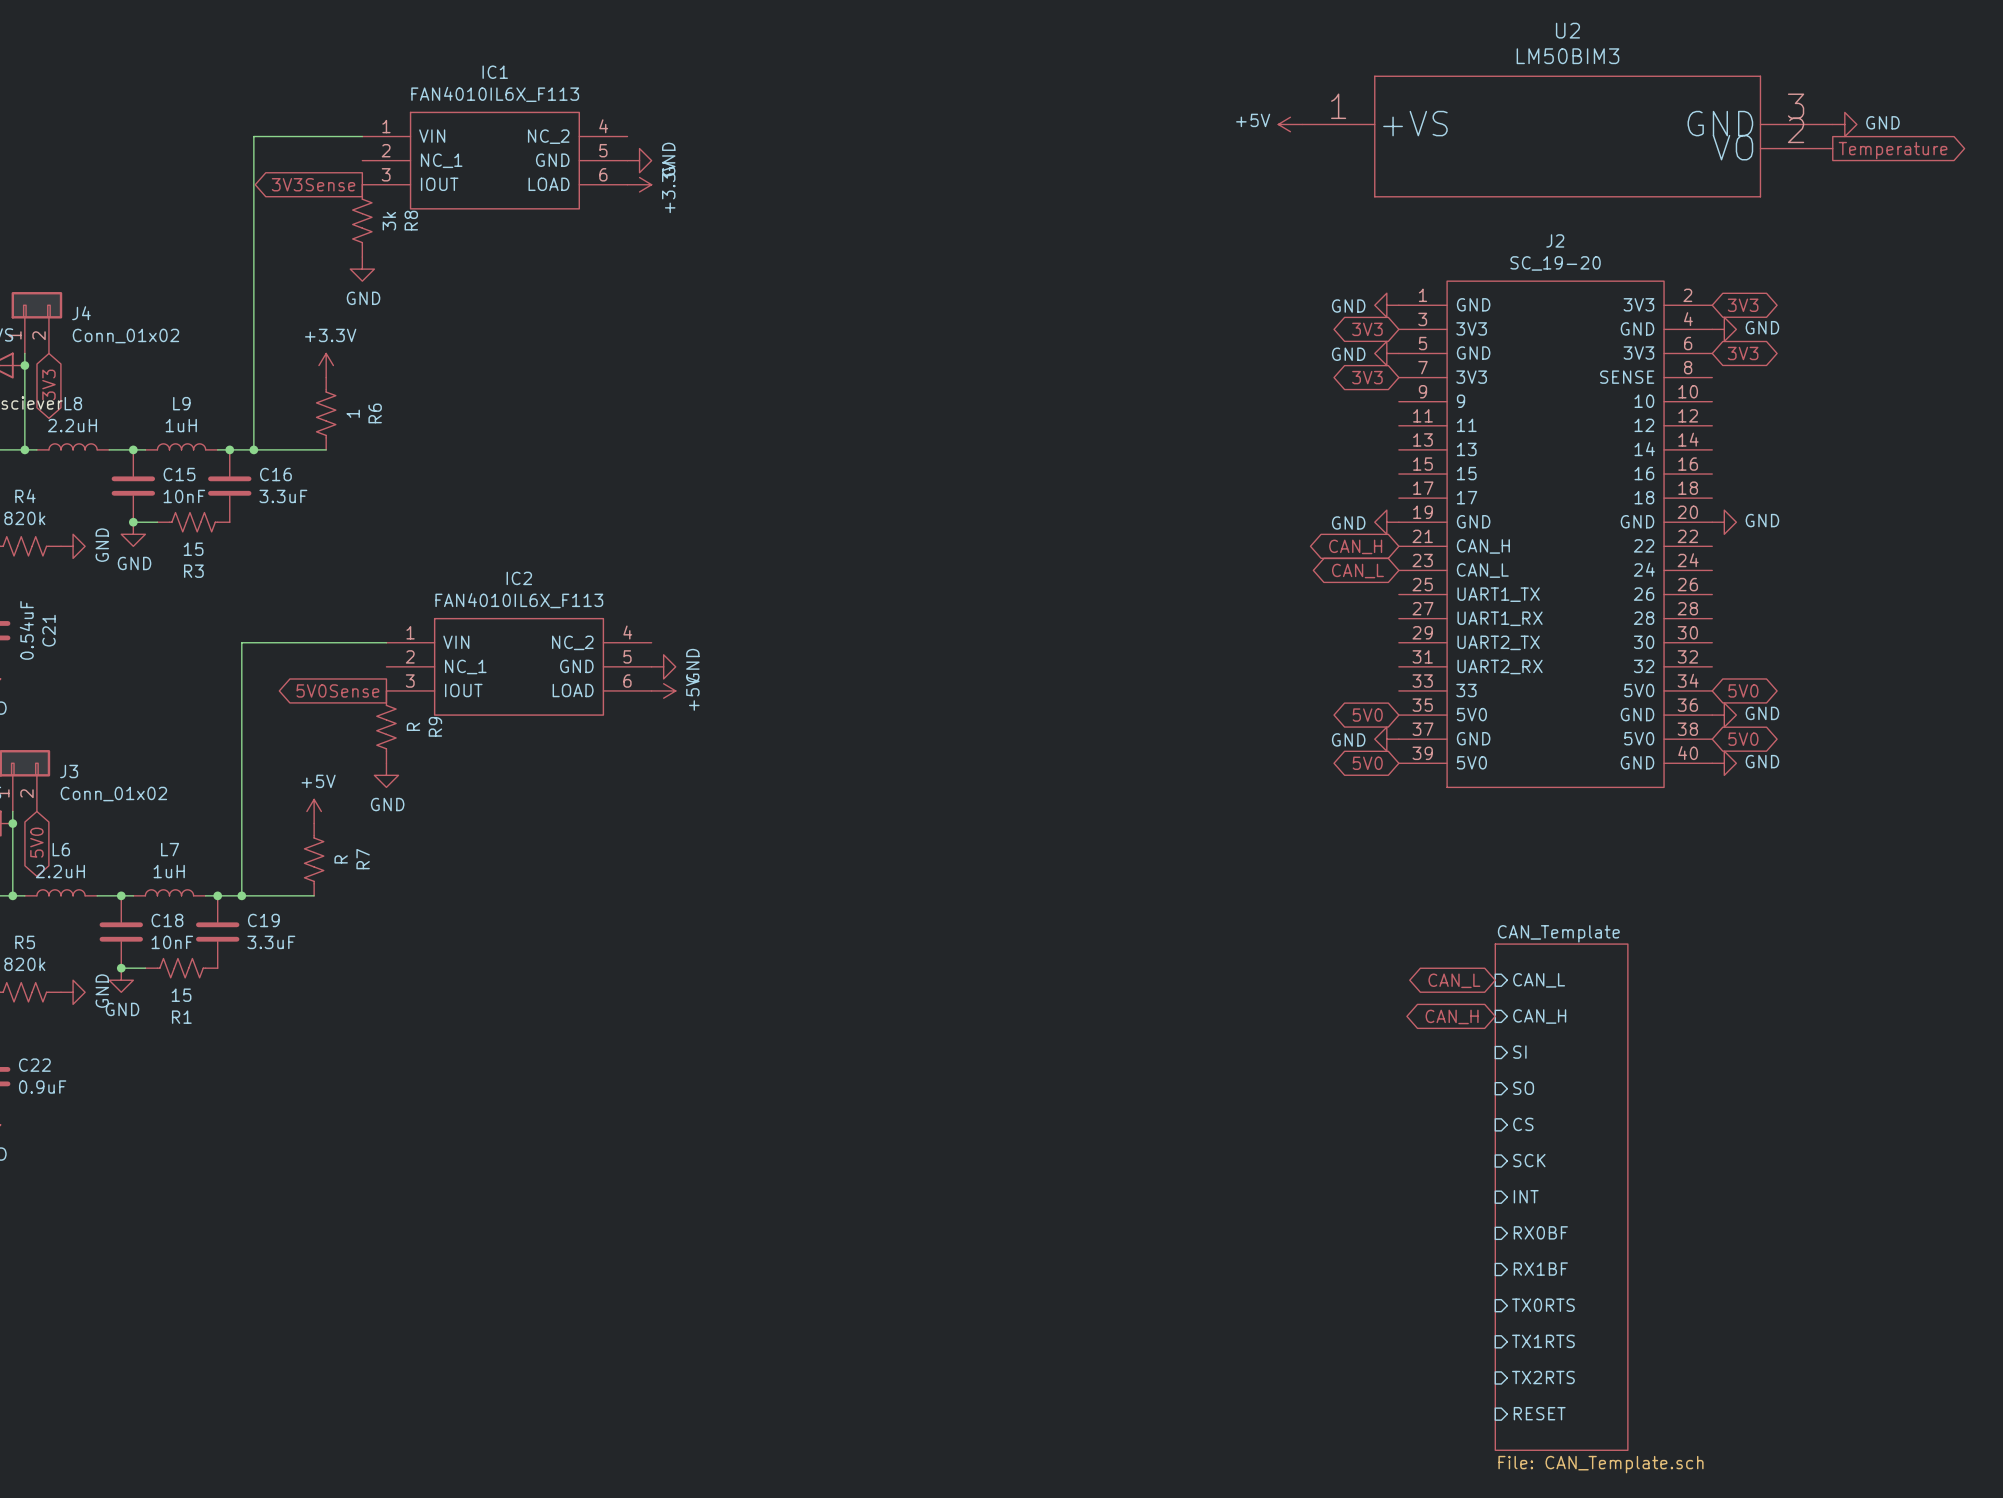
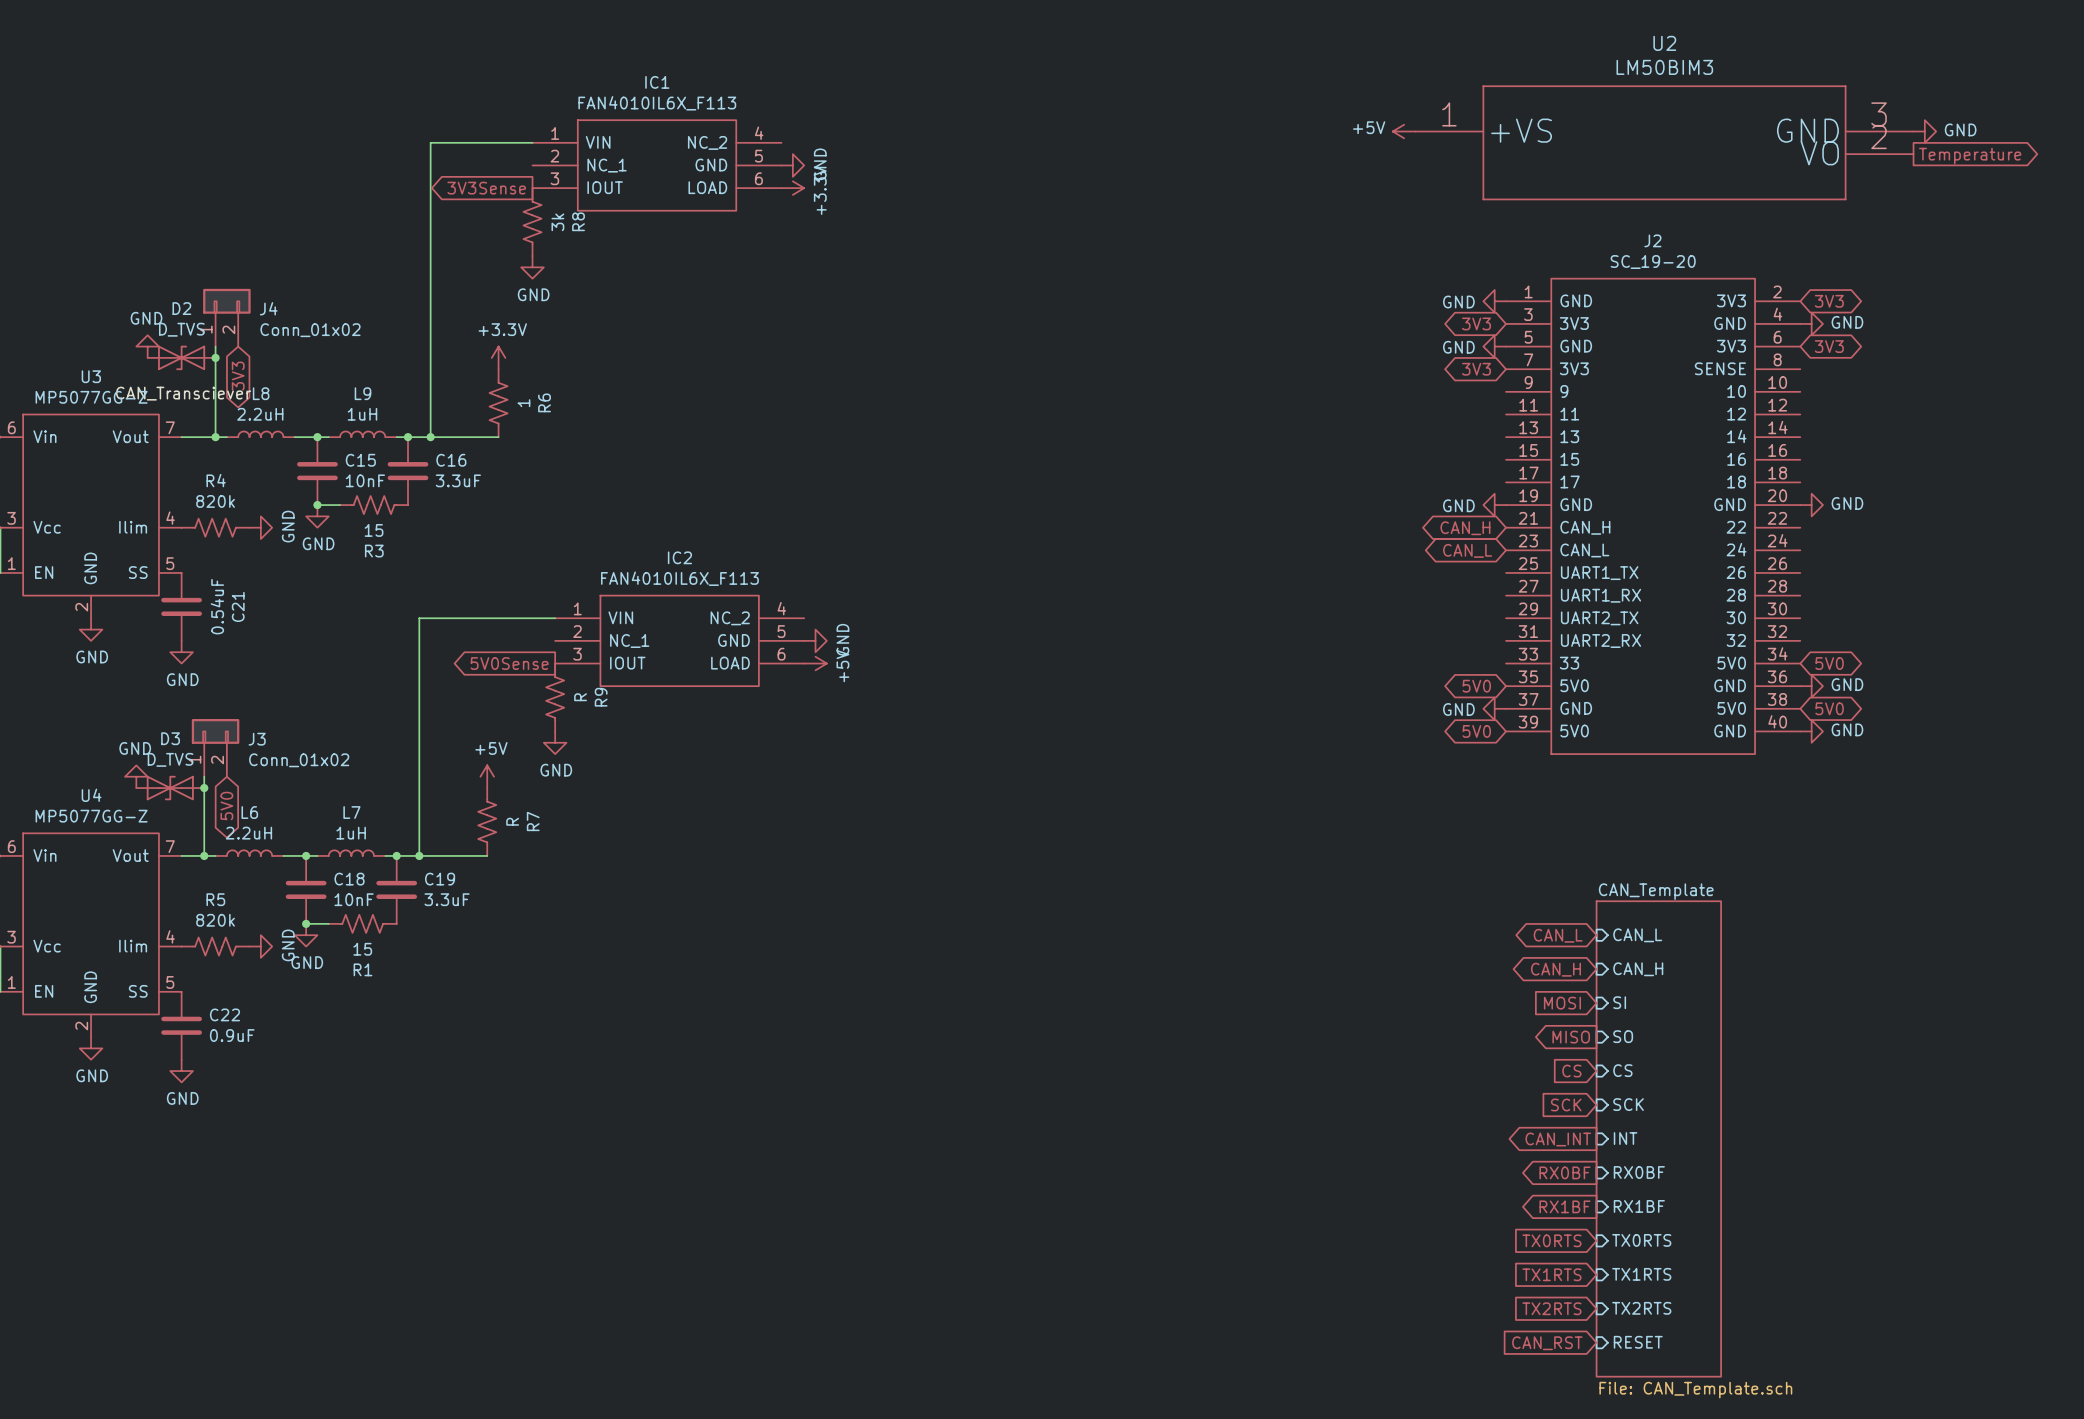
global label: none -> MOSI (1562, 1003)
global label: none -> MISO (1571, 1037)
global label: none -> CS (1571, 1071)
global label: none -> SCK (1566, 1105)
global label: none -> CAN_INT (1558, 1139)
global label: none -> RX0BF (1565, 1172)
global label: none -> RX1BF (1565, 1206)
global label: none -> TX0RTS (1551, 1240)
global label: none -> TX1RTS (1551, 1274)
global label: none -> TX2RTS (1551, 1308)
global label: none -> CAN_RST (1547, 1343)

